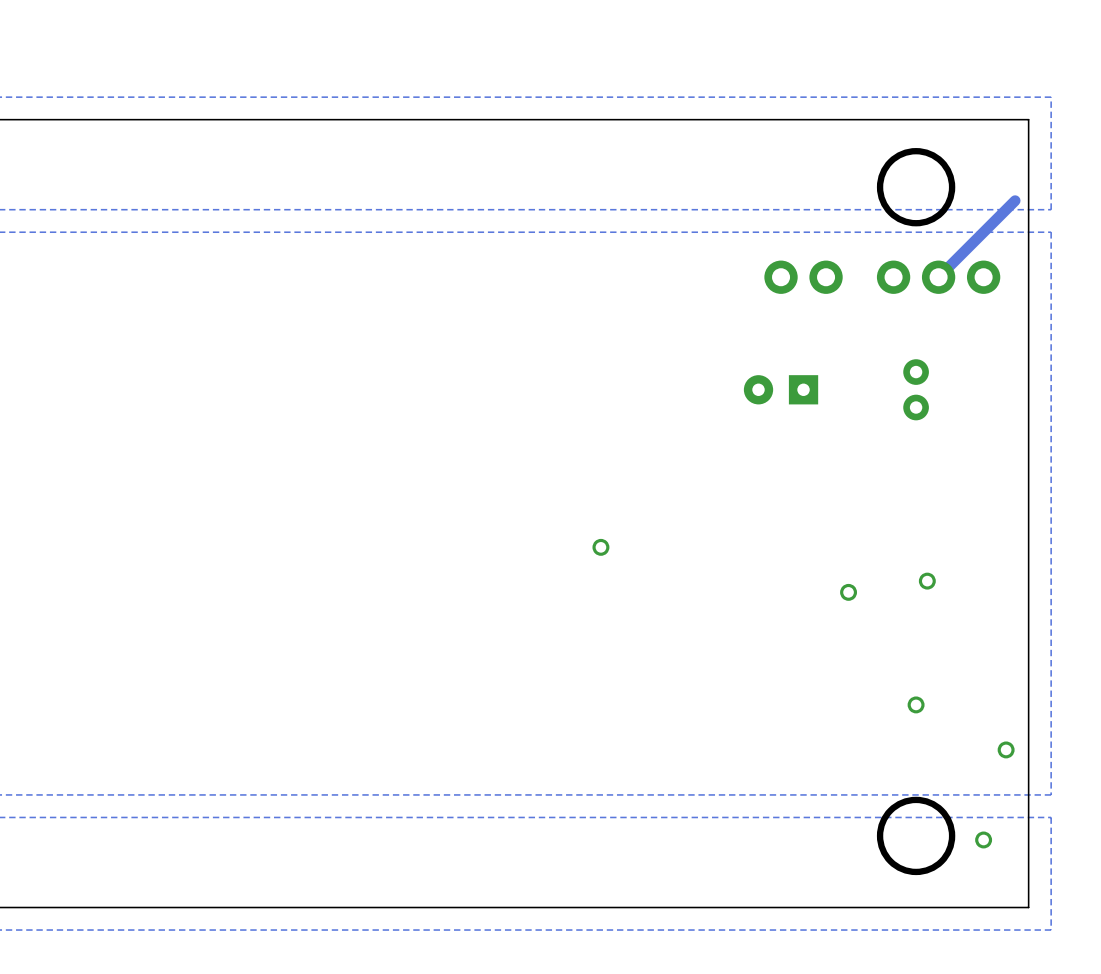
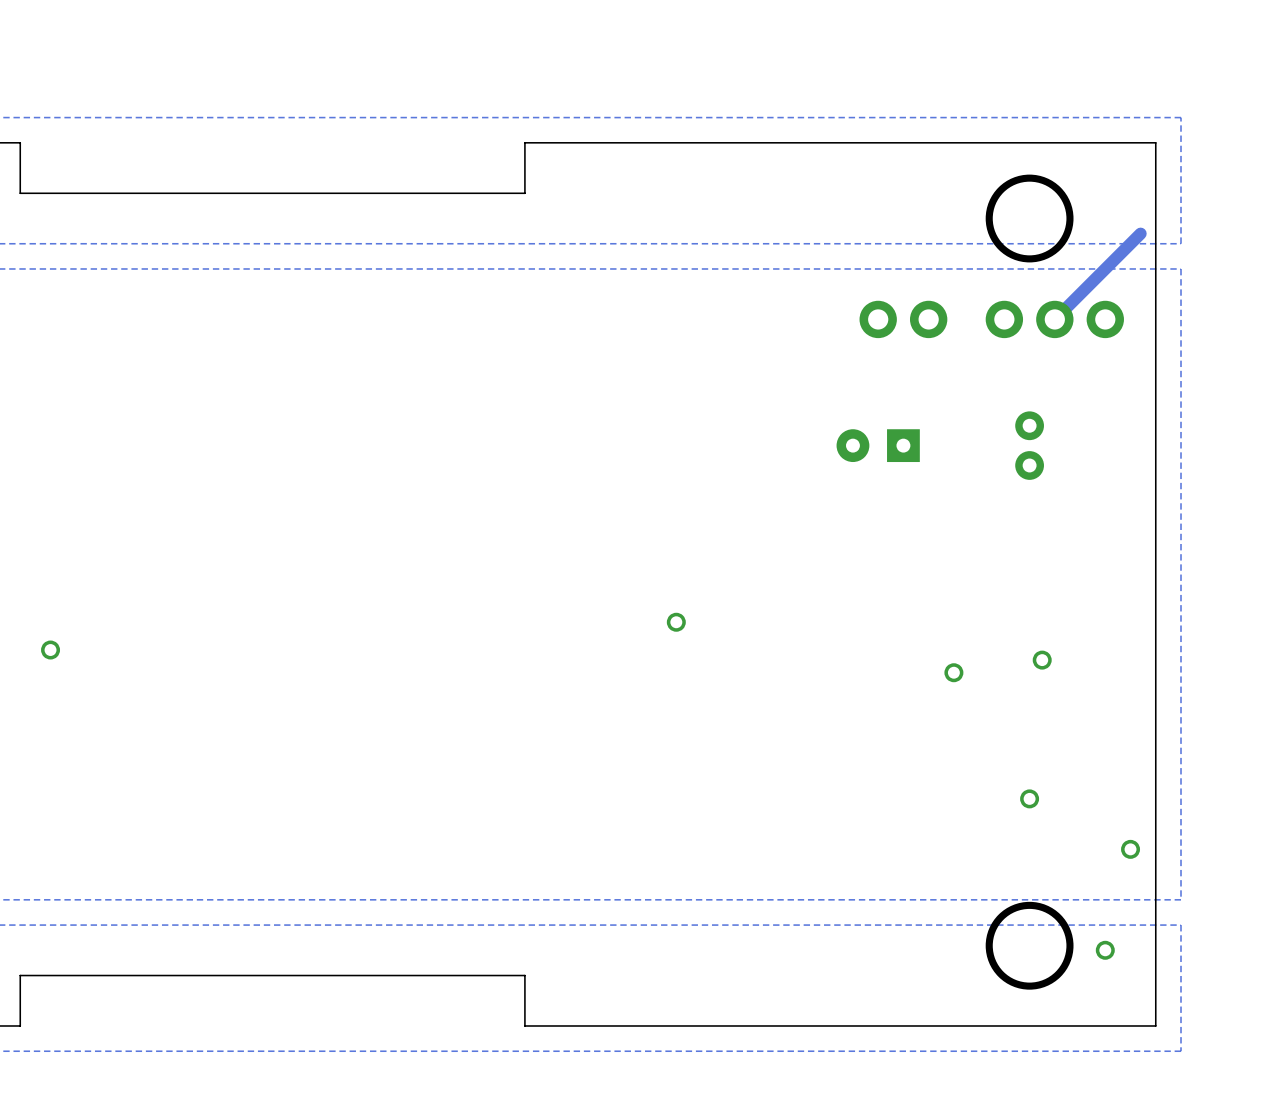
board edge: (465, 119) (15, 119) -> (524, 142) (524, 193) (20, 193) (20, 142)
via: none -> (50, 650)
board edge: (465, 907) (15, 907) -> (524, 1025) (524, 975) (20, 975) (20, 1025)

